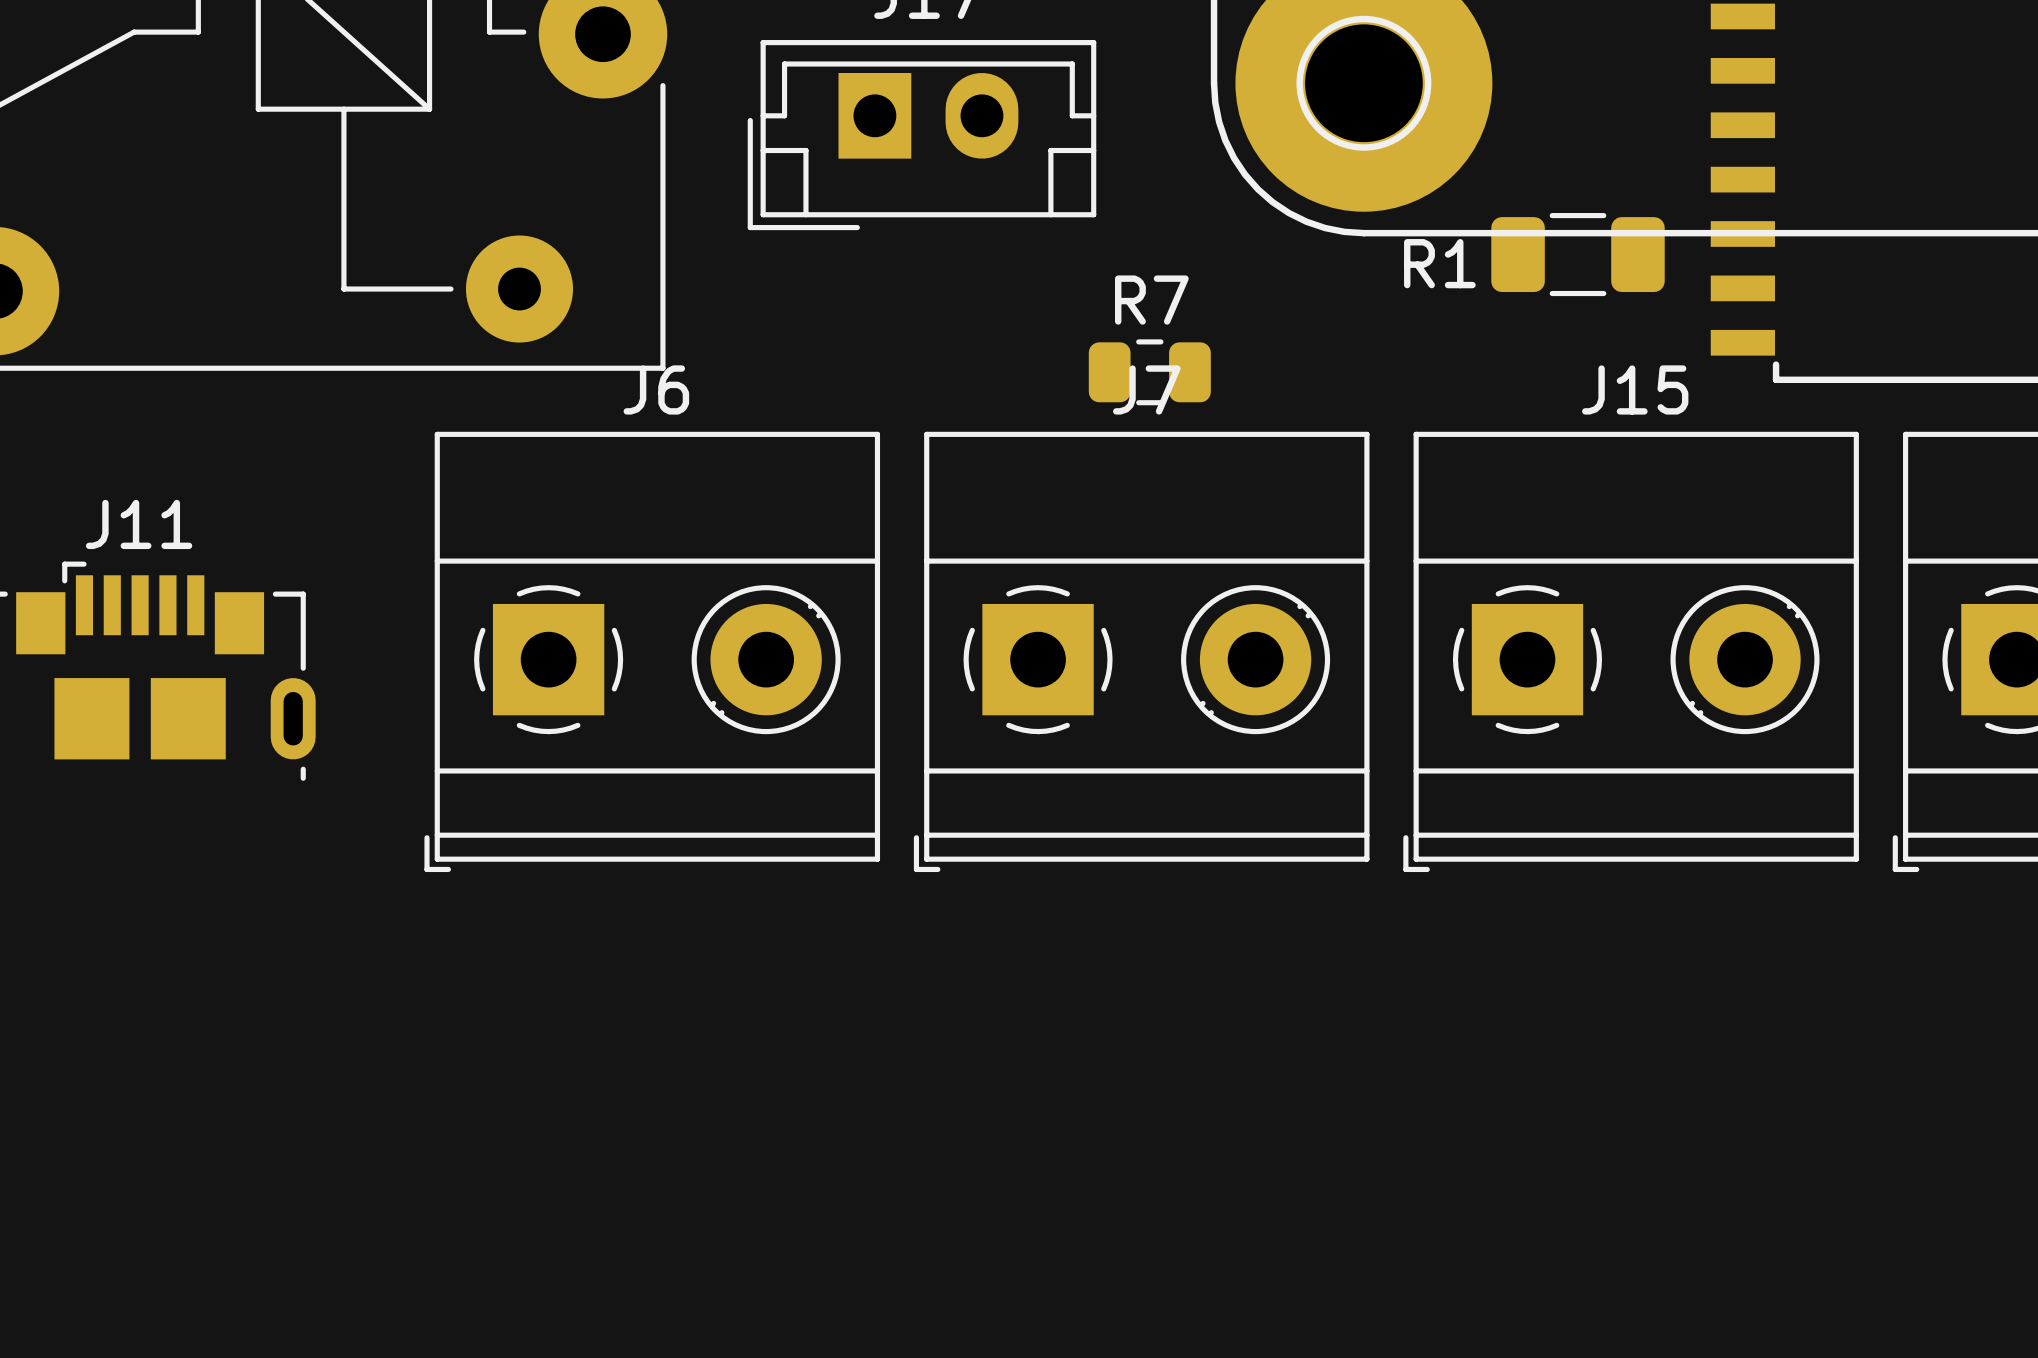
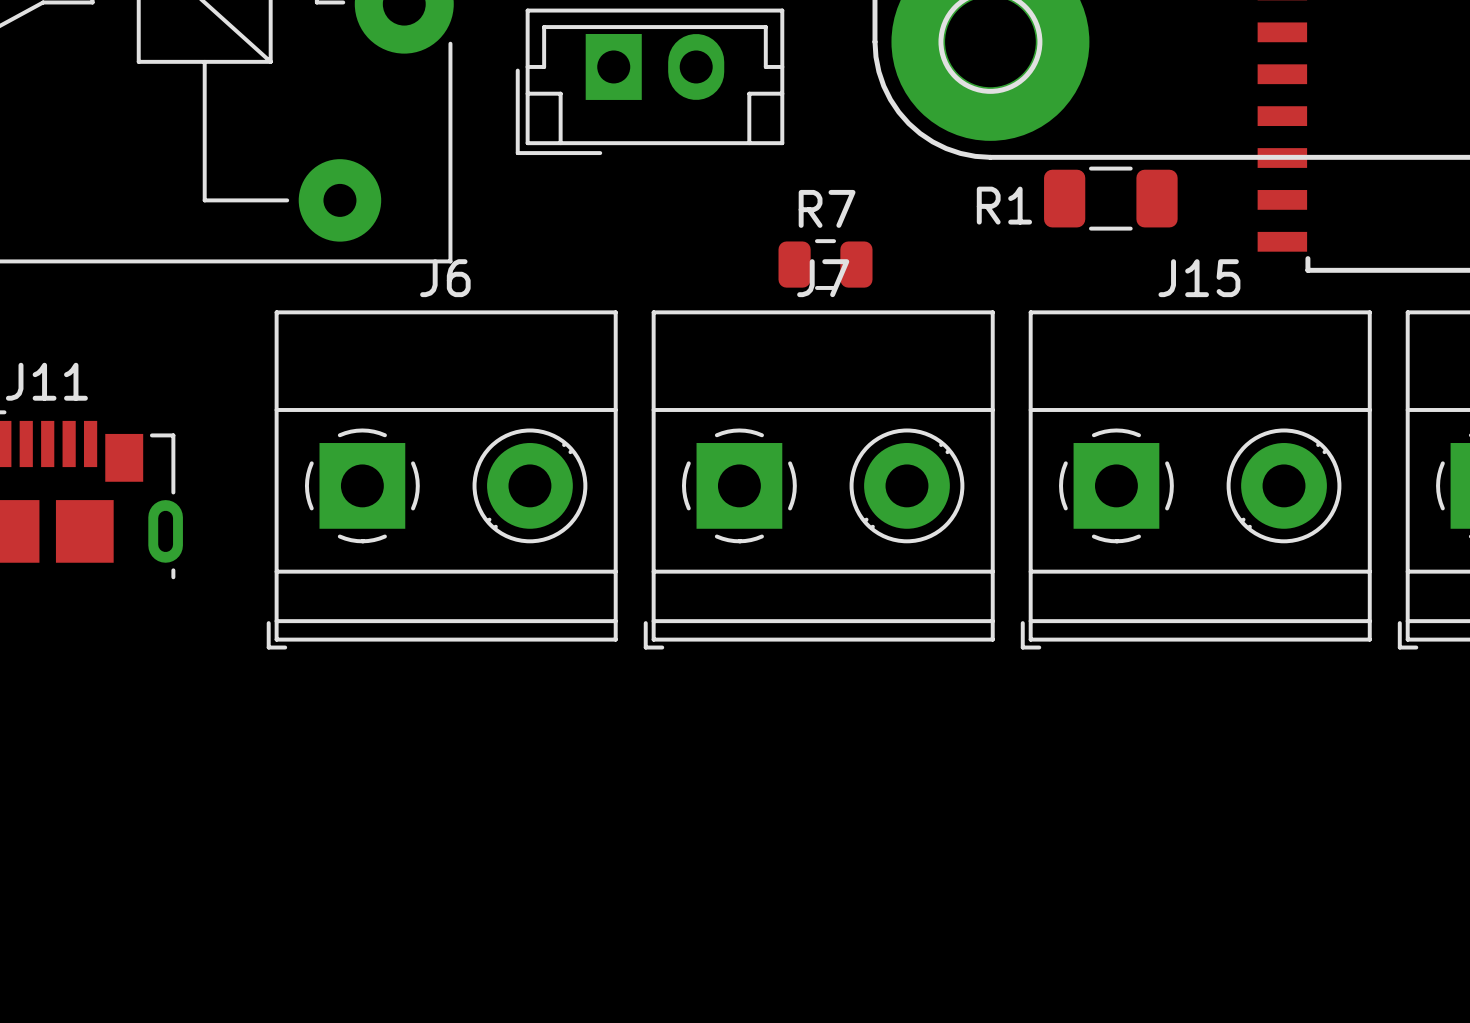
R1 position: (1578, 254) -> (1110, 198)

